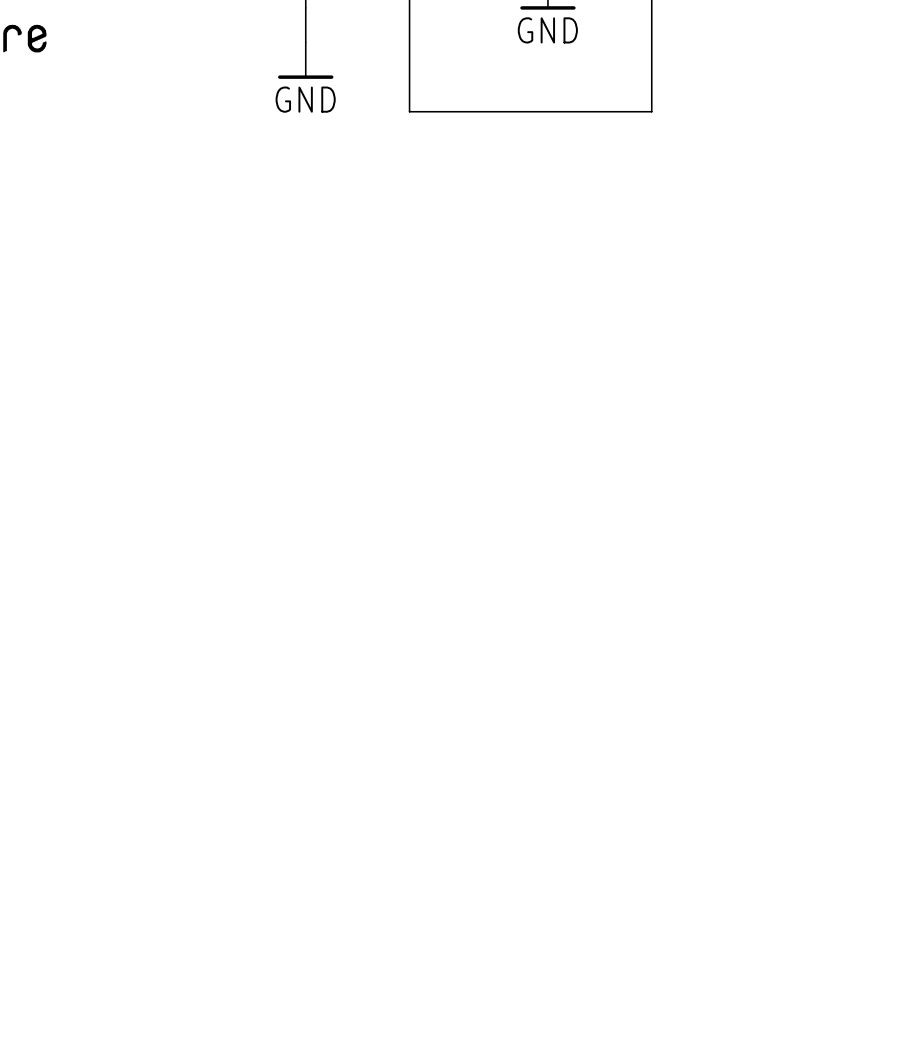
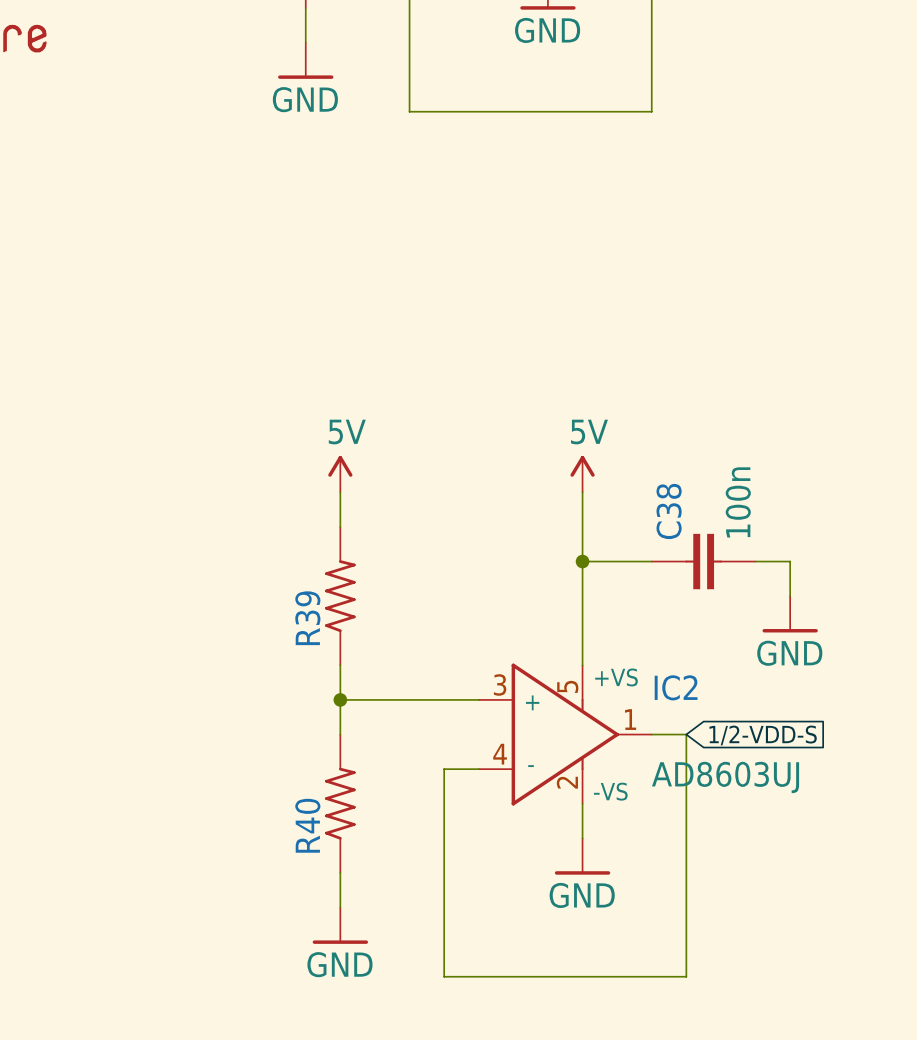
power symbol: none -> 5V (340, 474)
power symbol: none -> 5V (582, 474)
wire: none -> (340, 492) (340, 526)
wire: none -> (582, 492) (582, 665)
wire: none -> (582, 561) (651, 561)
junction: none -> (582, 561)
C38: none -> 100n (703, 561)
wire: none -> (755, 561) (790, 561) (790, 596)
R39: none -> (340, 596)
power symbol: none -> GND (790, 614)
wire: none -> (340, 665) (340, 734)
wire: none -> (340, 699) (478, 699)
junction: none -> (340, 699)
IC2: none -> AD8603UJ (565, 734)
wire: none -> (651, 734) (686, 734) (686, 976) (444, 976) (444, 769) (478, 769)
global label: none -> 1/2-VDD-S (763, 735)
R40: none -> (340, 803)
wire: none -> (582, 803) (582, 838)
power symbol: none -> GND (582, 856)
wire: none -> (340, 872) (340, 907)
power symbol: none -> GND (340, 925)

